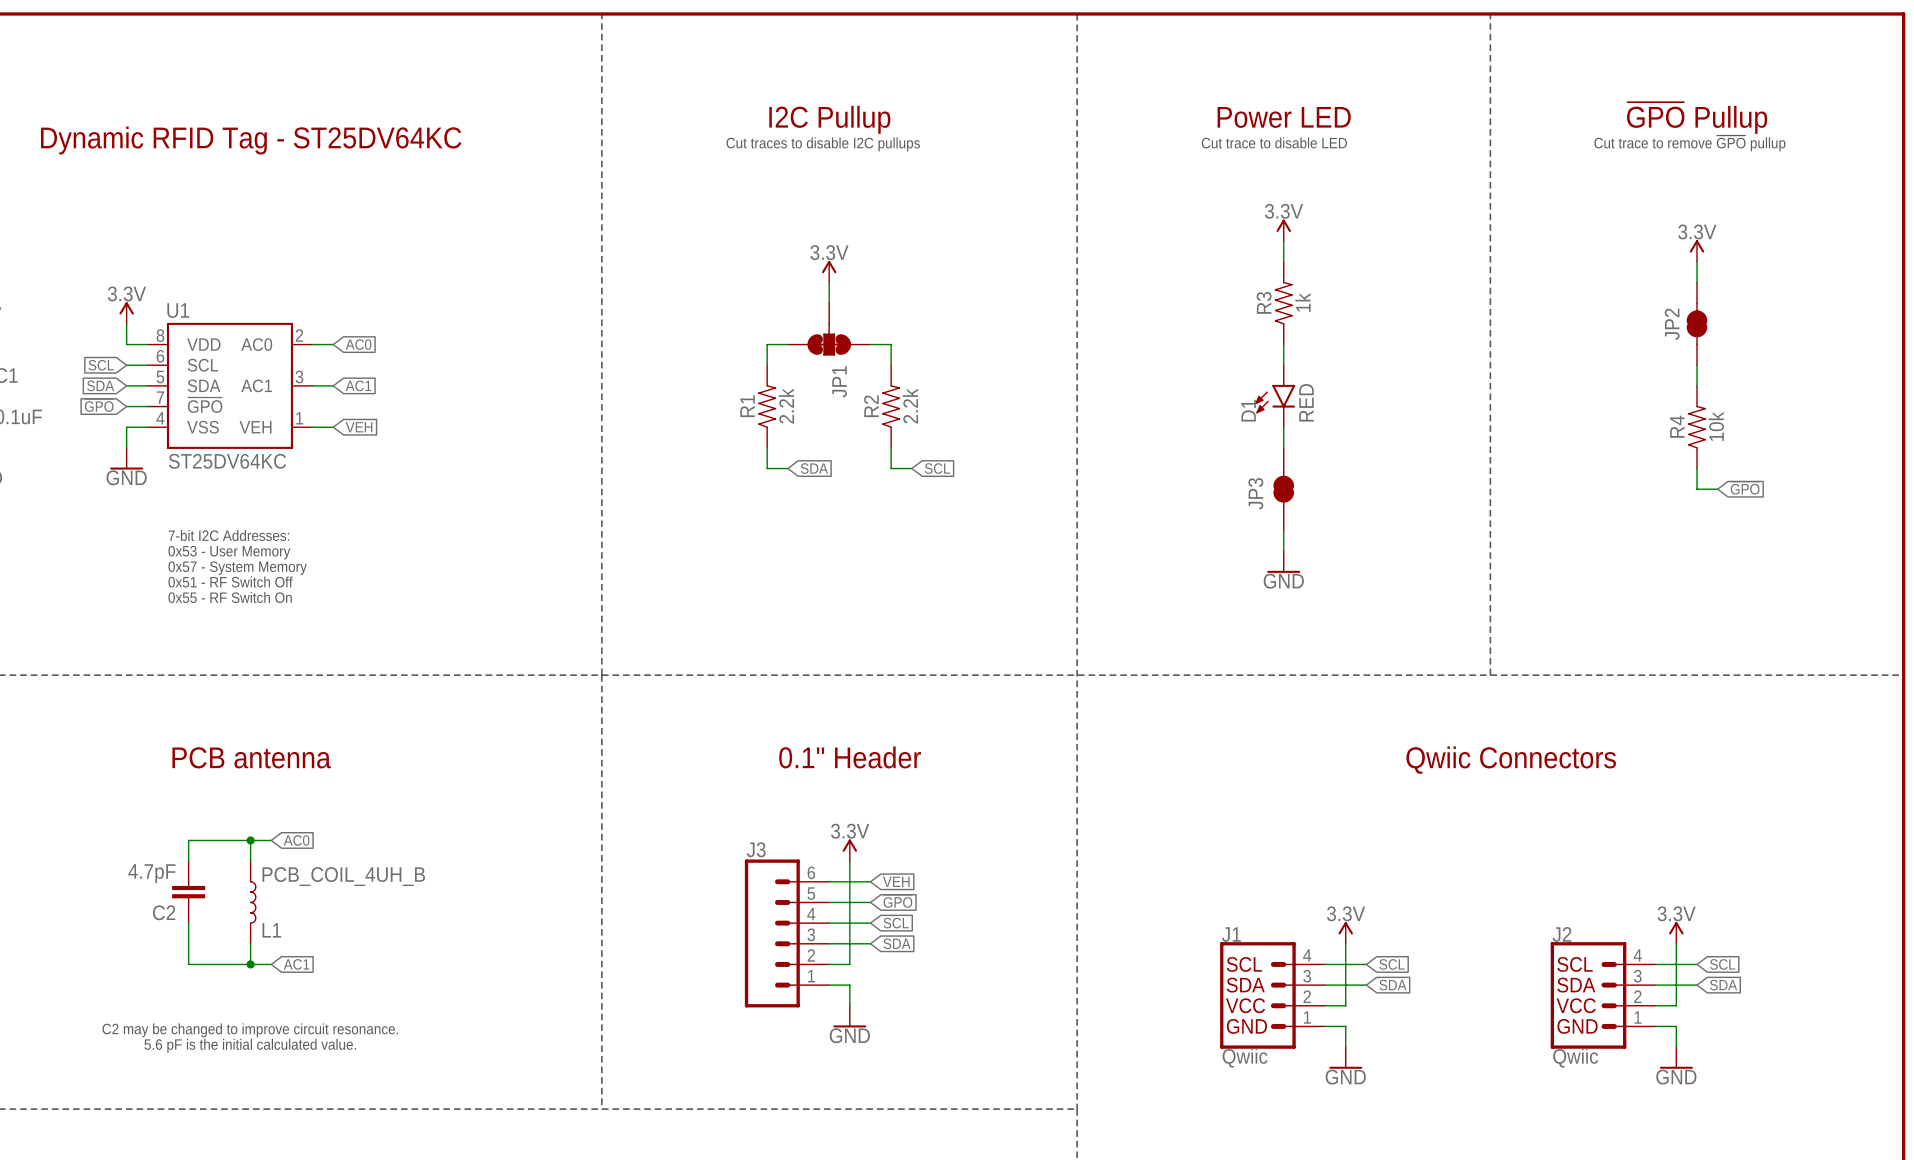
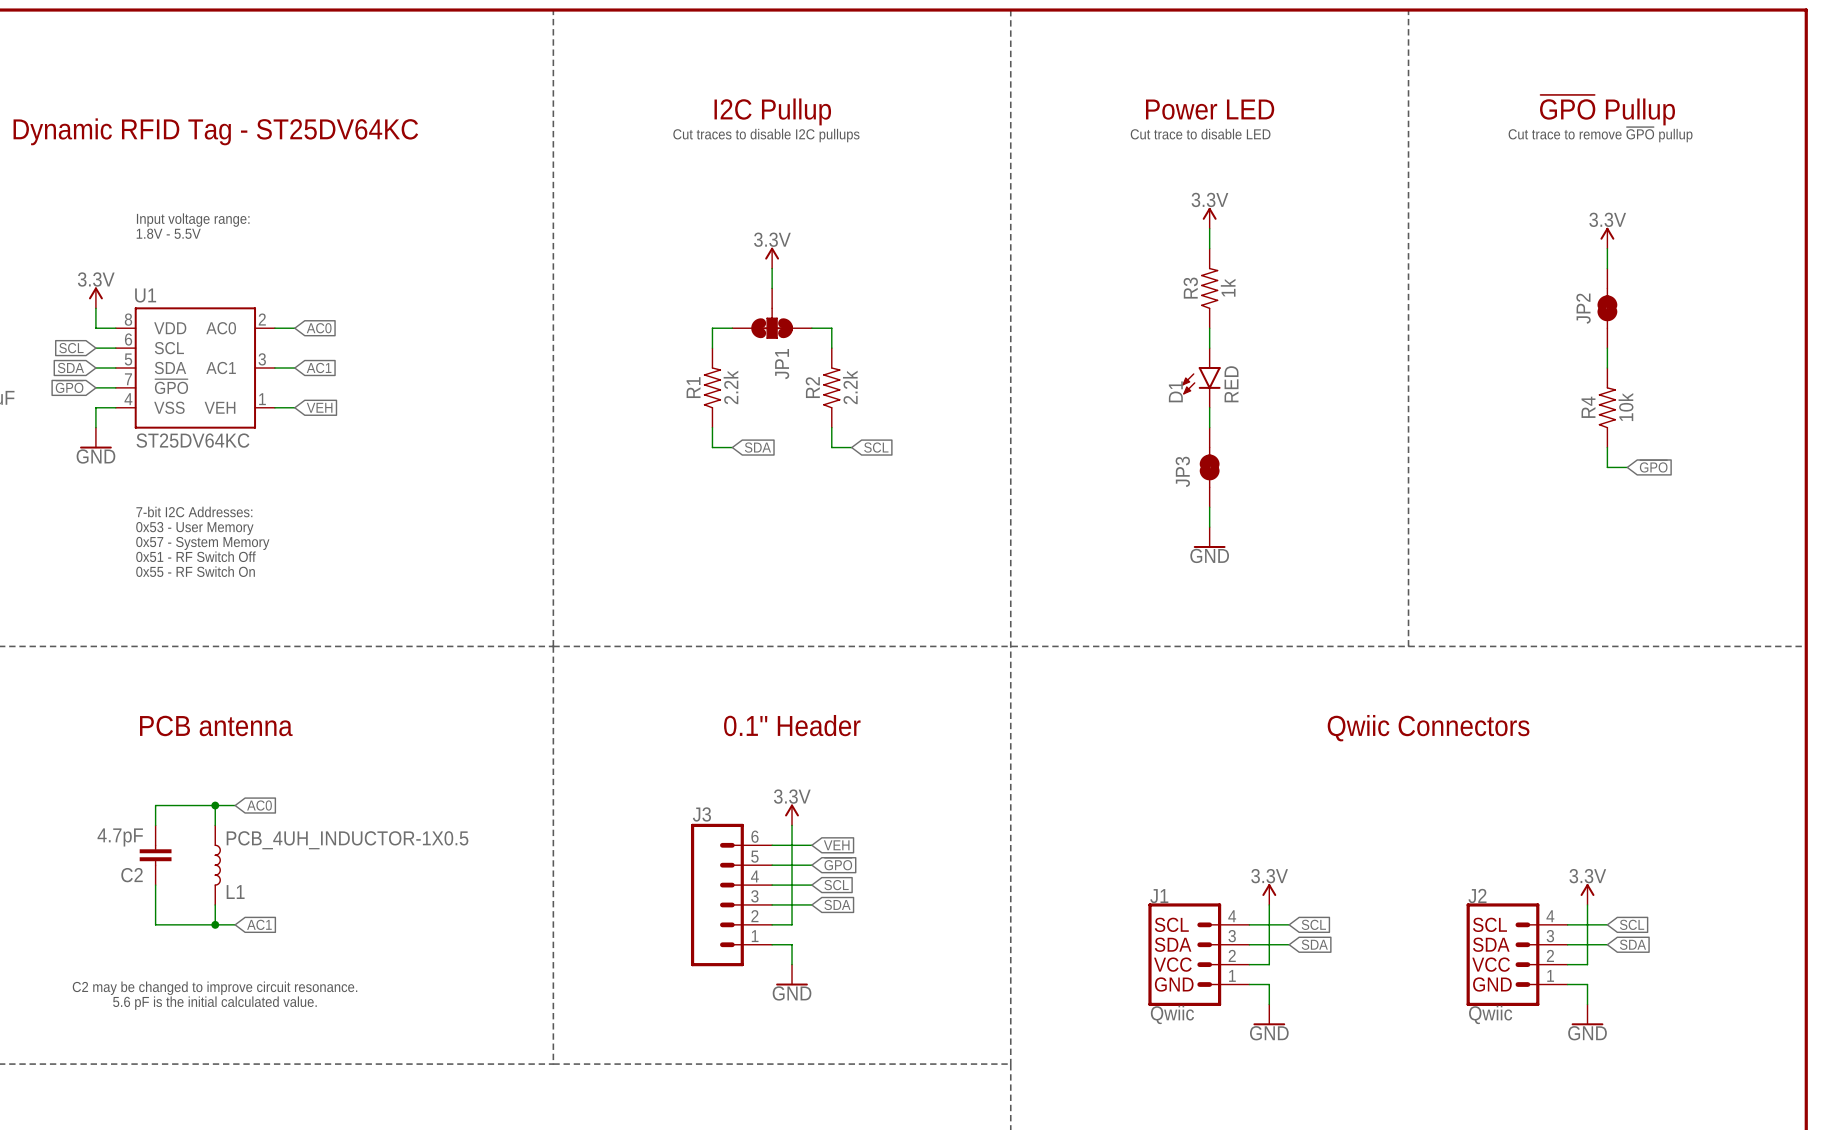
text: none -> Input voltage range: (193, 220)
text: none -> 1.8V - 5.5V (168, 233)
L1 value: PCB_COIL_4UH_B (343, 876) -> PCB_4UH_INDUCTOR-1X0.5 (347, 840)

